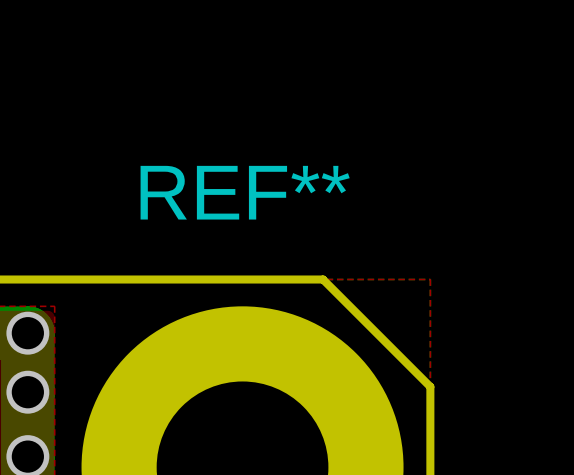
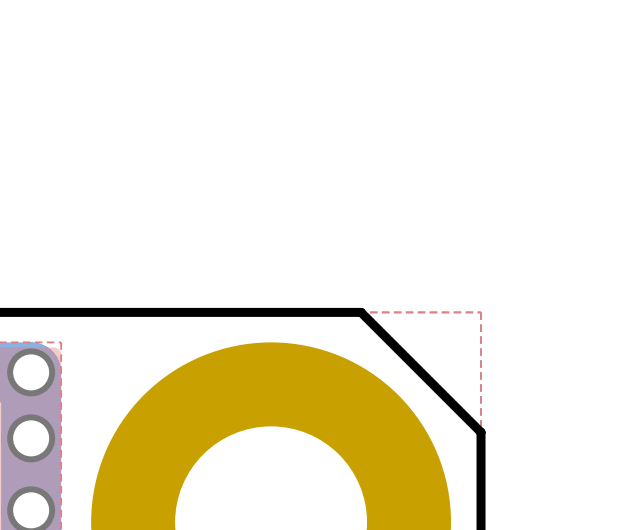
REF** name: REF** (245, 192) -> none

